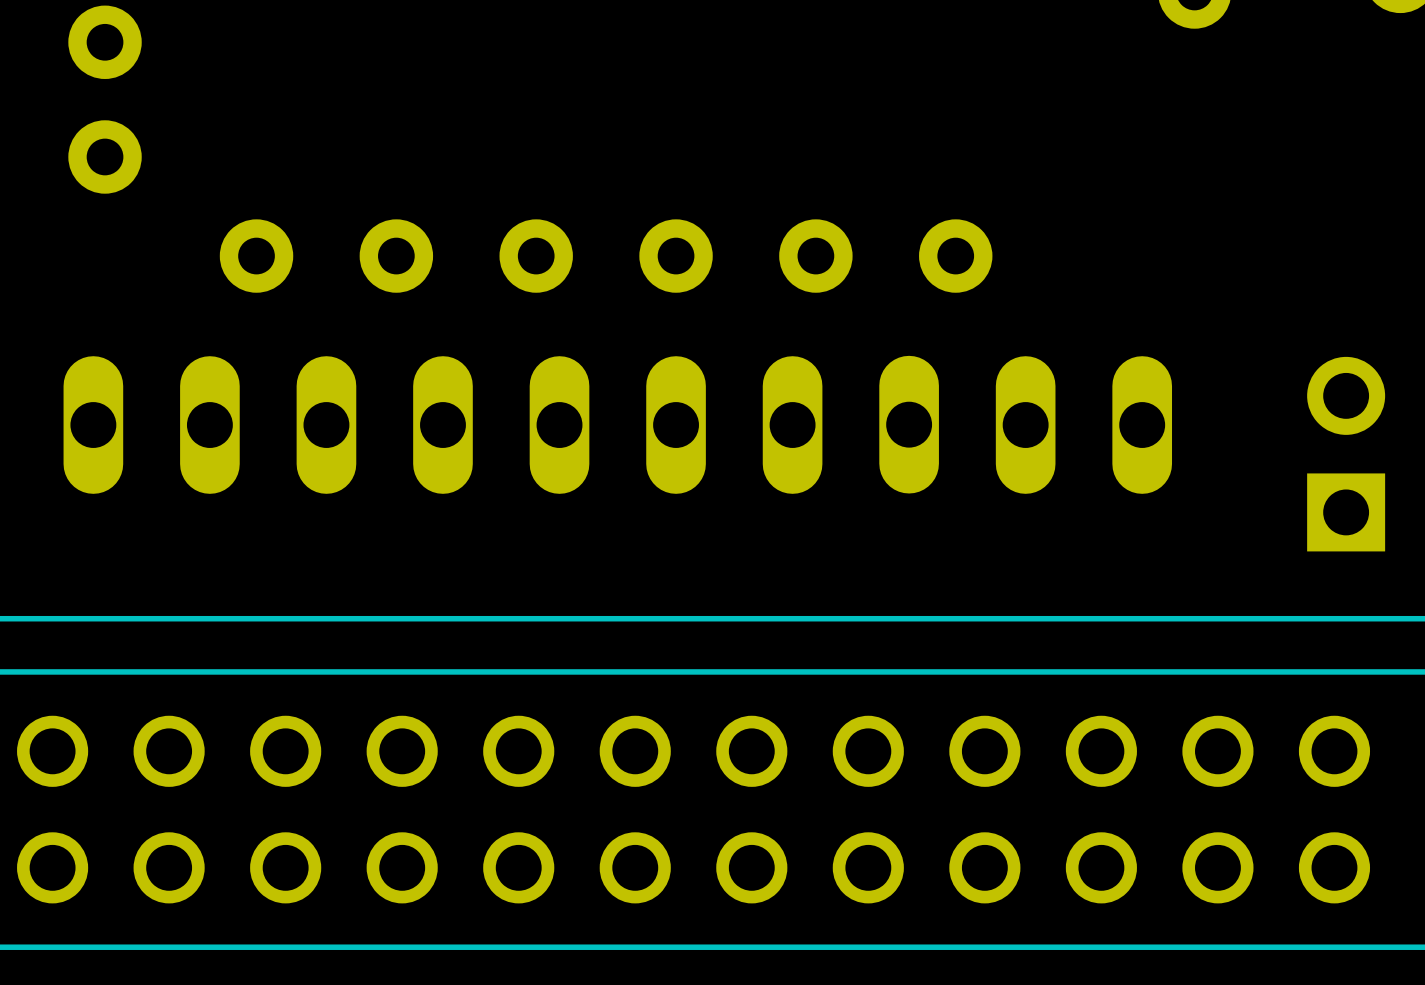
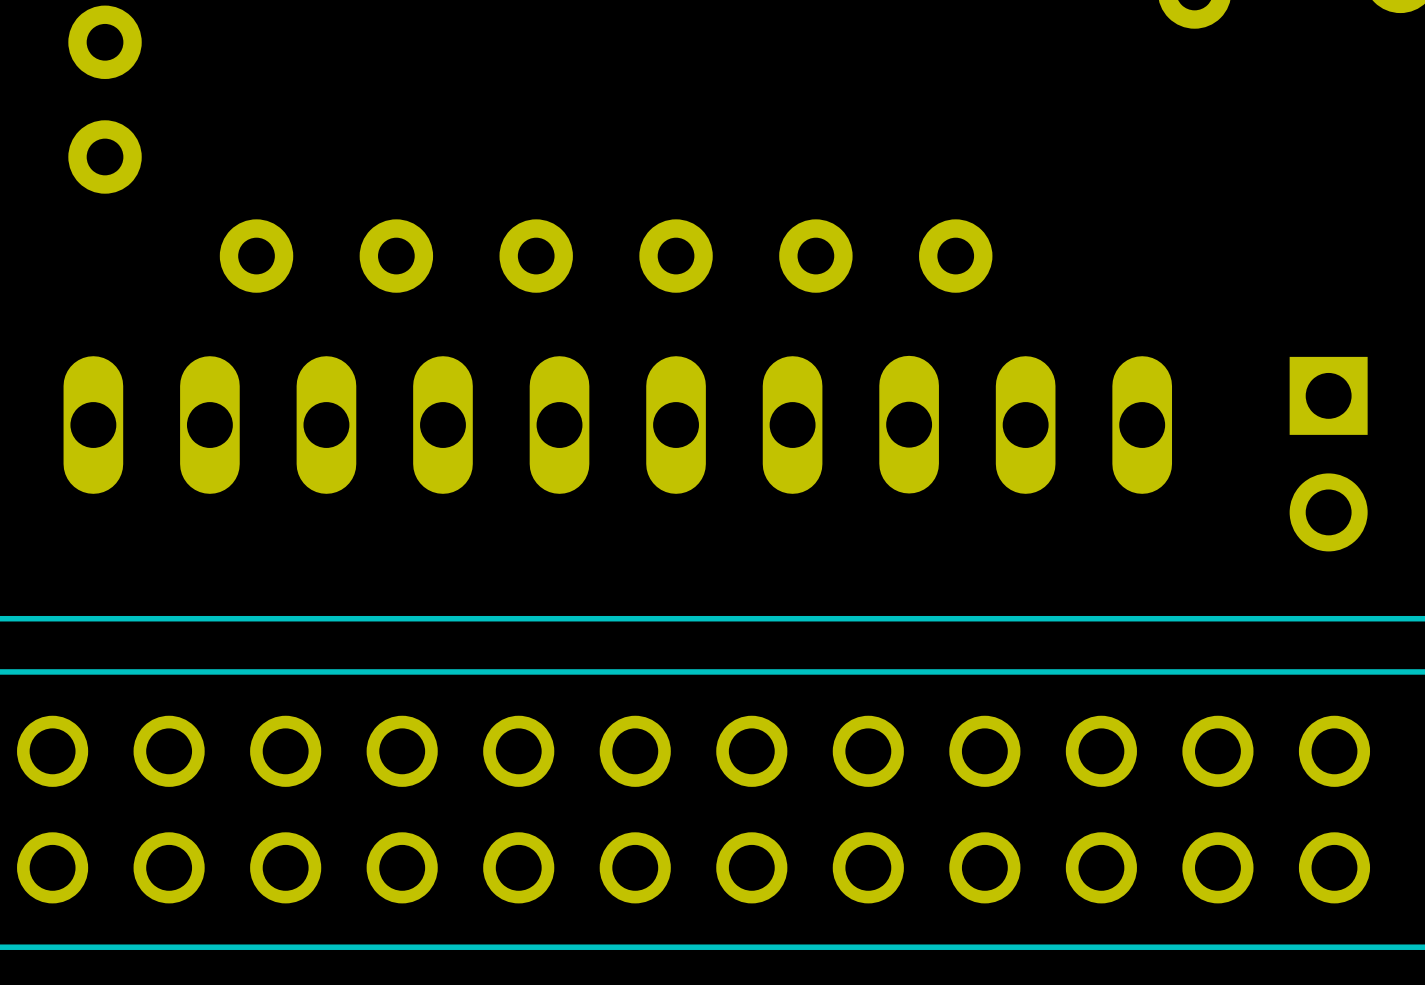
part rotation: 0° (1346, 454) -> 180° (1328, 454)

